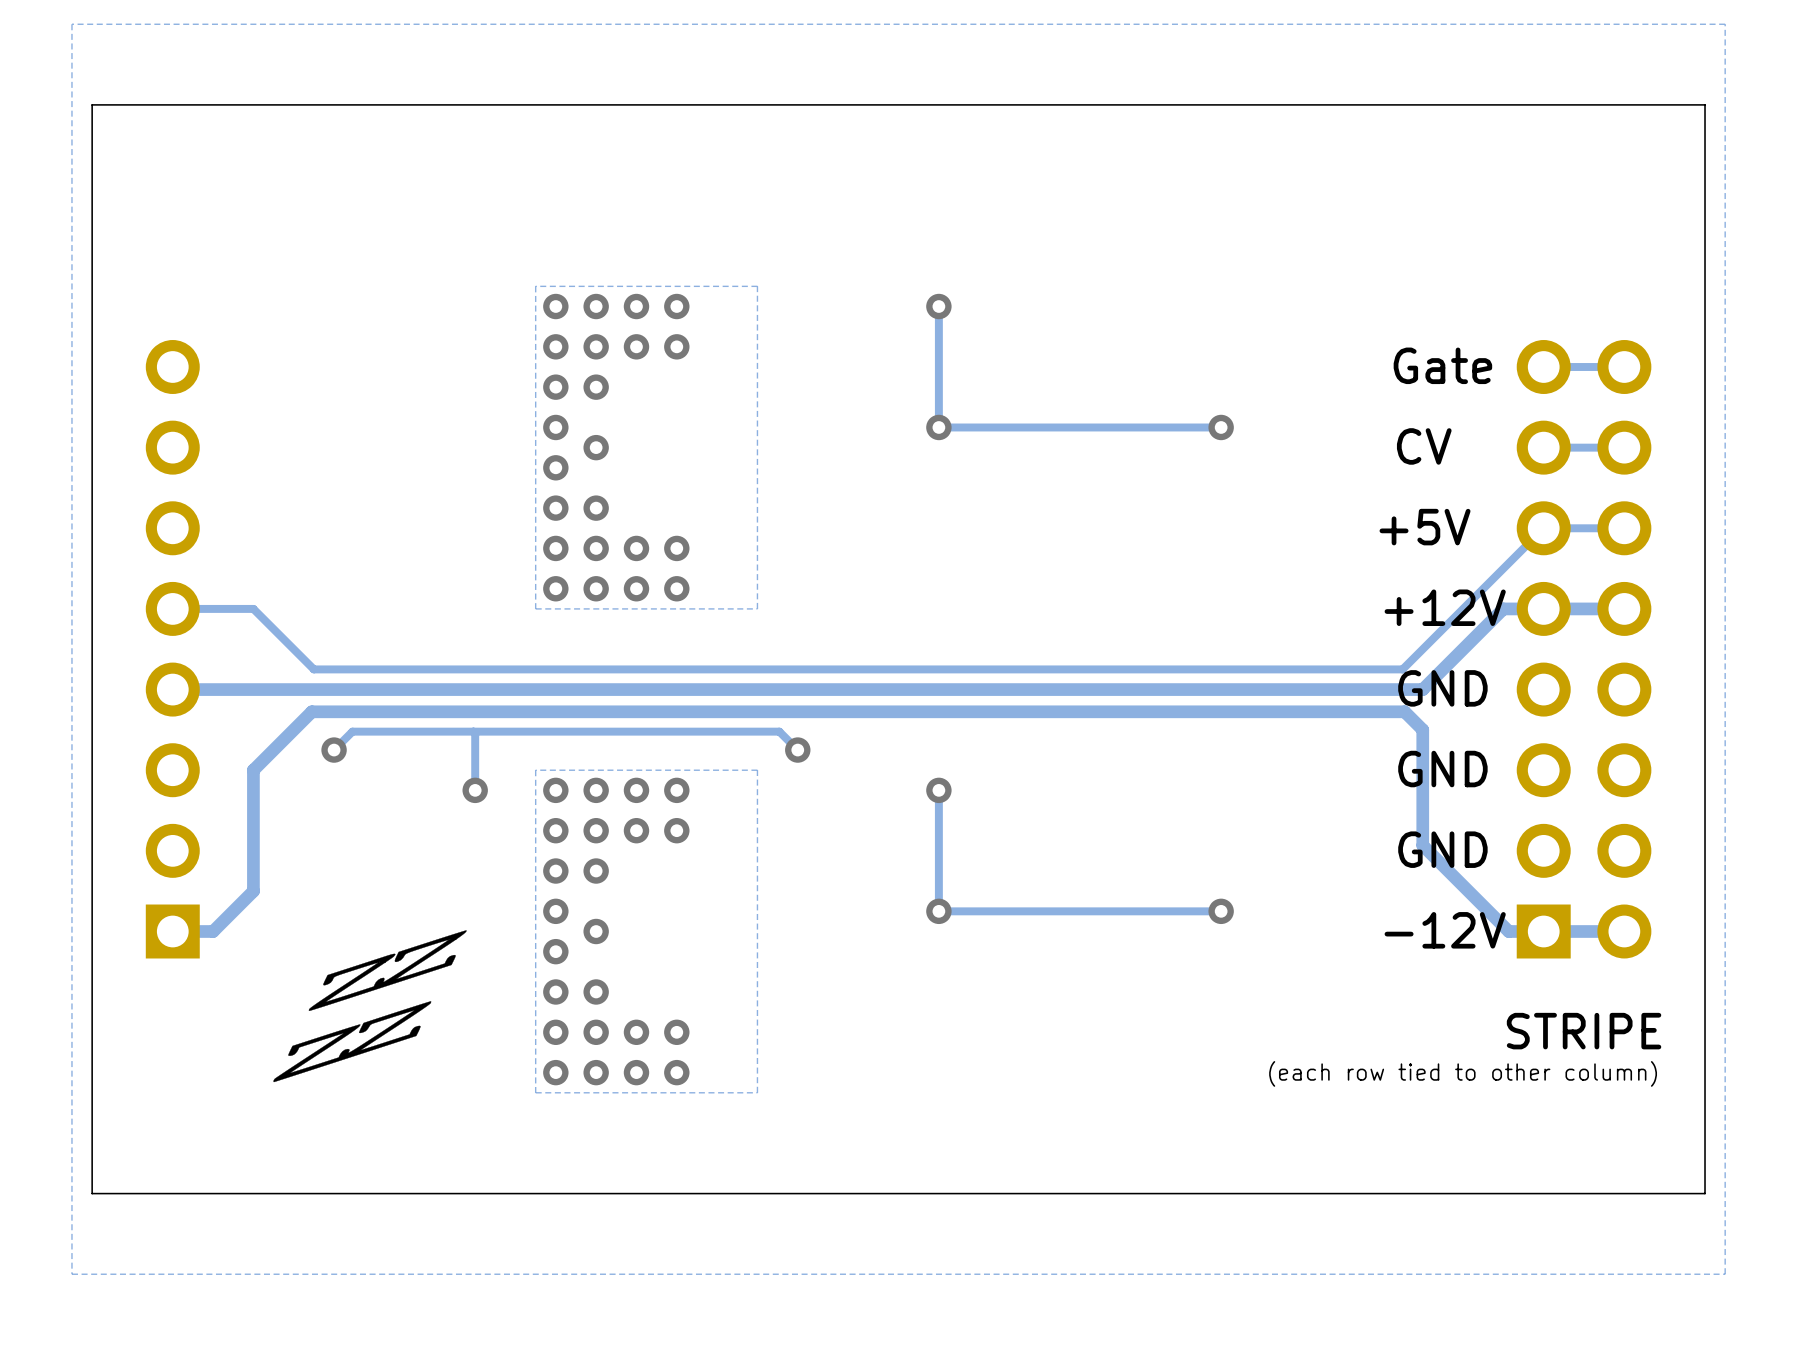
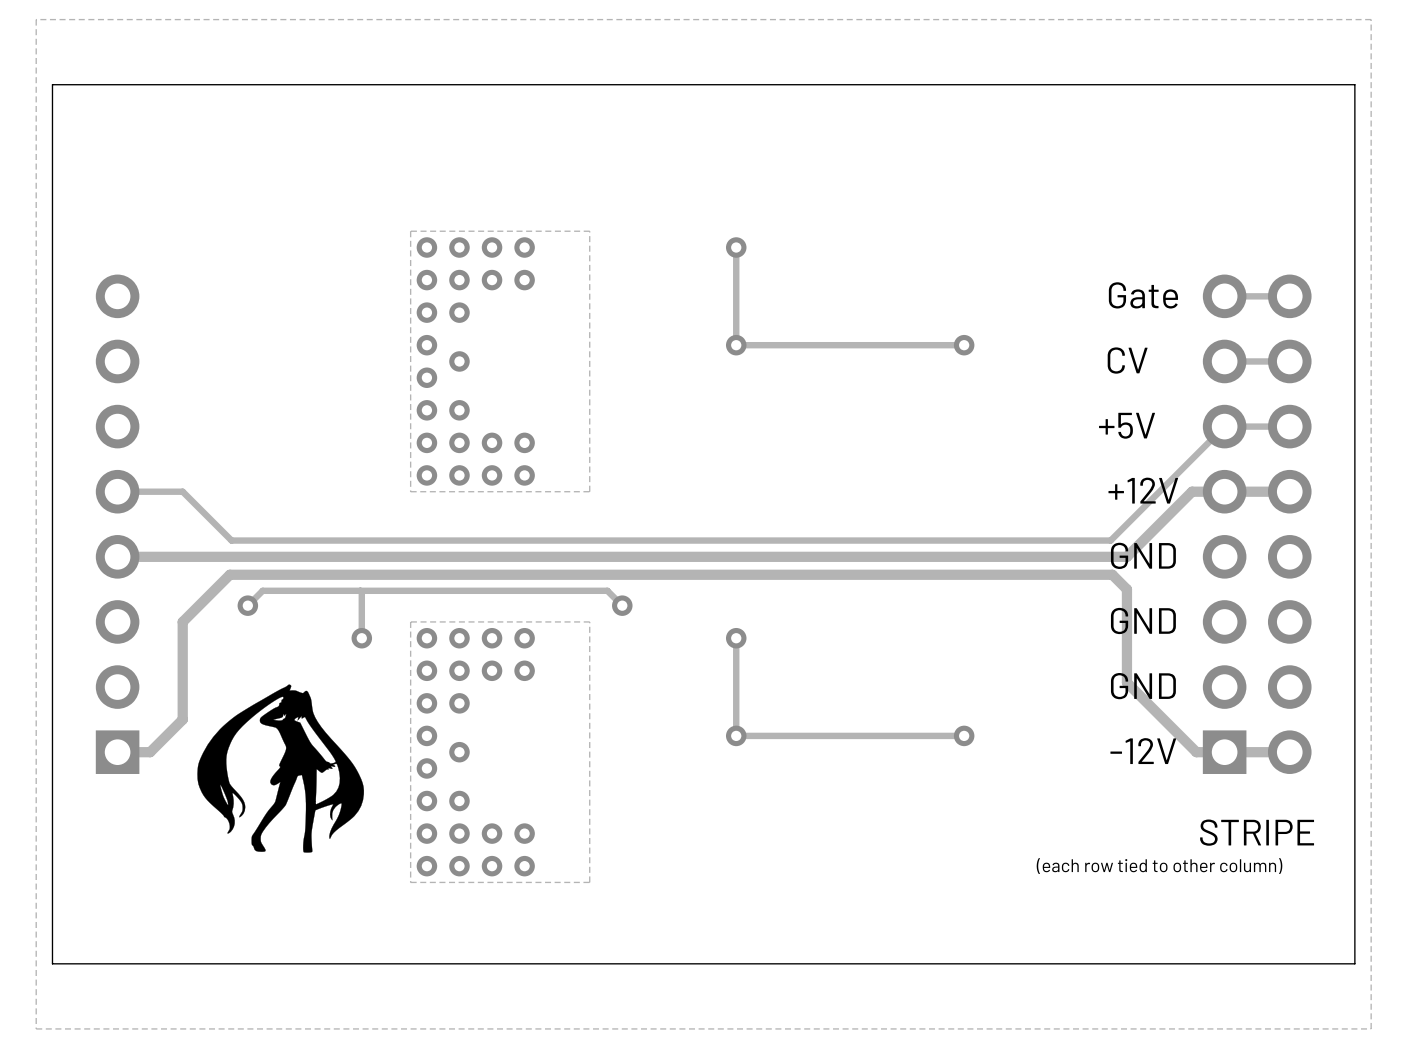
drawing: none -> [197, 684, 365, 853]
drawing: [273, 930, 467, 1083] -> none

